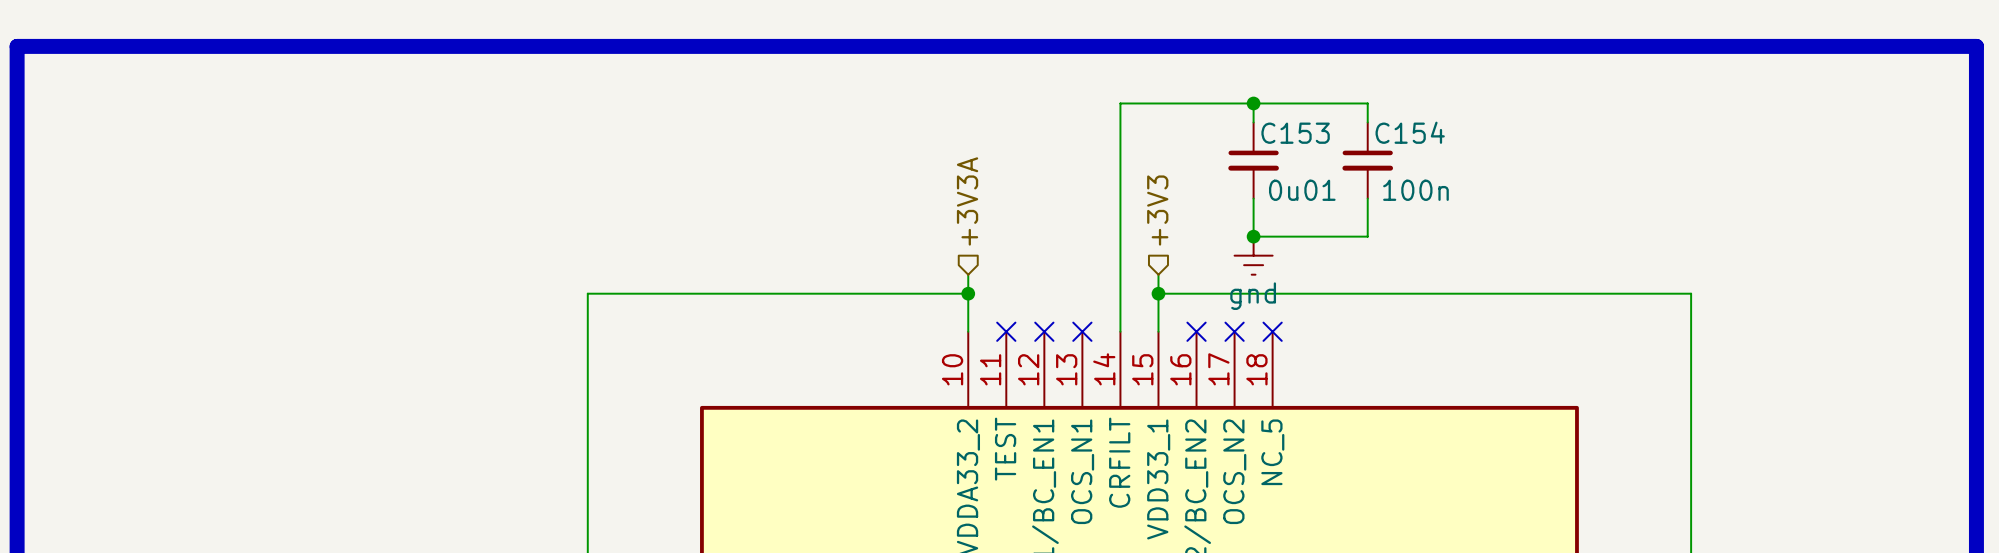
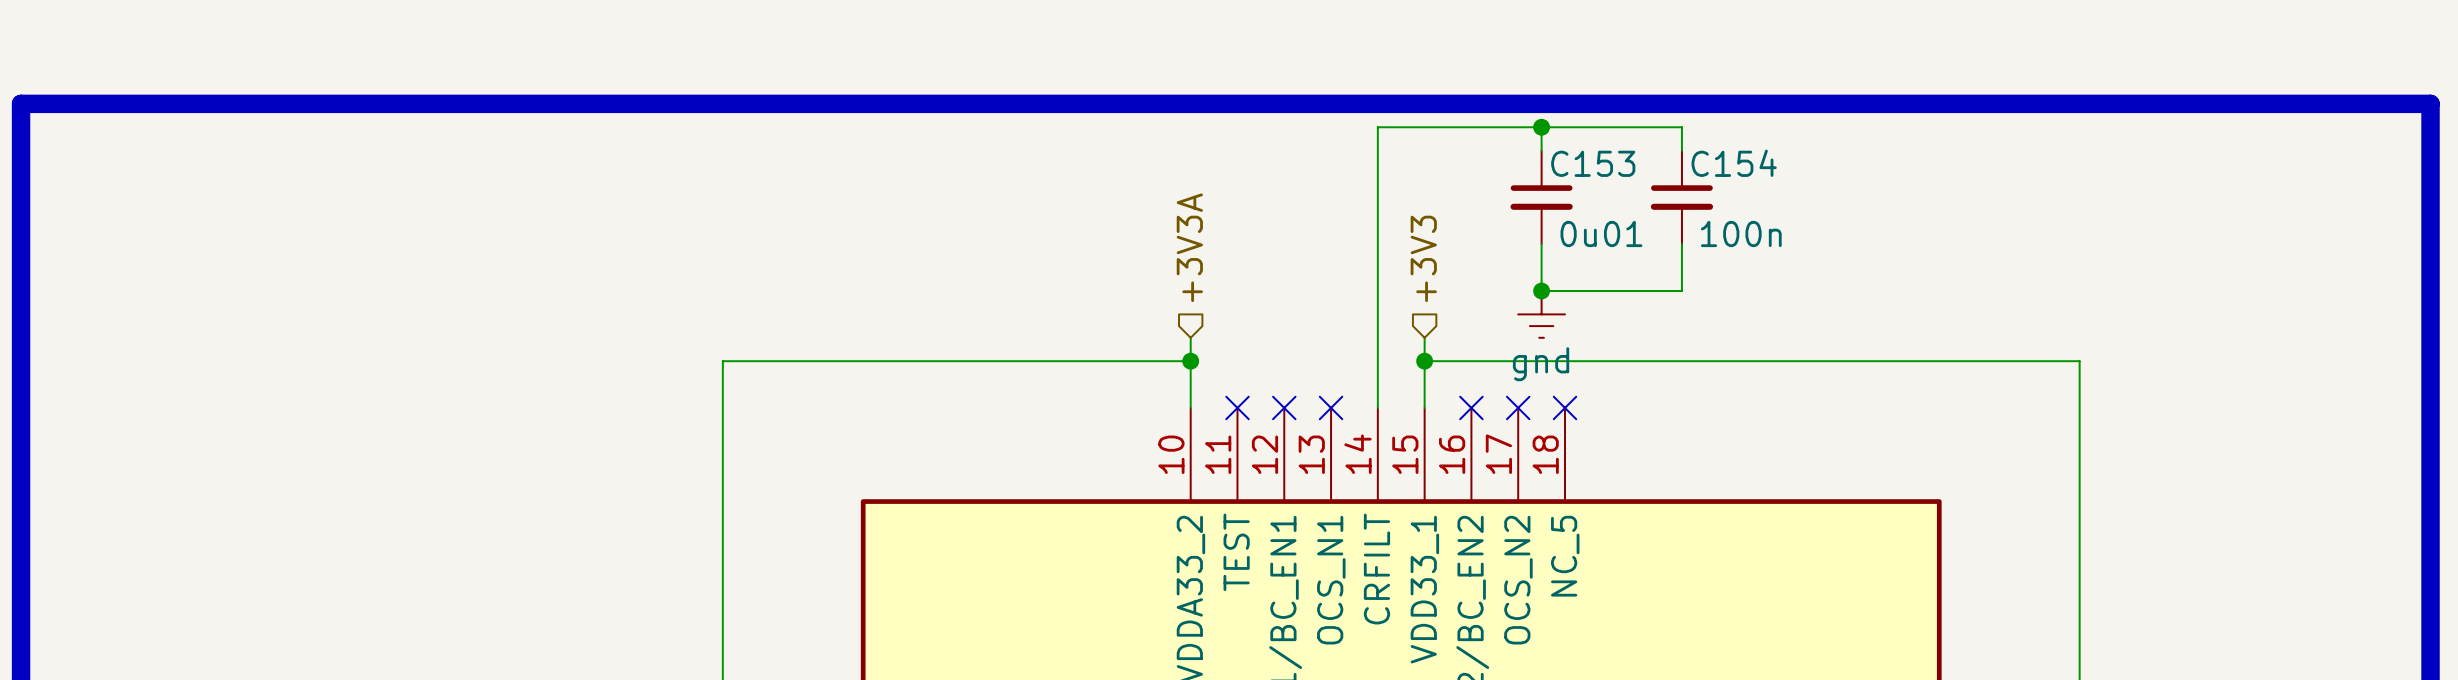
line: (17, 84) (17, 46) (1976, 46) (1976, 84) -> (21, 103) (2430, 103)

